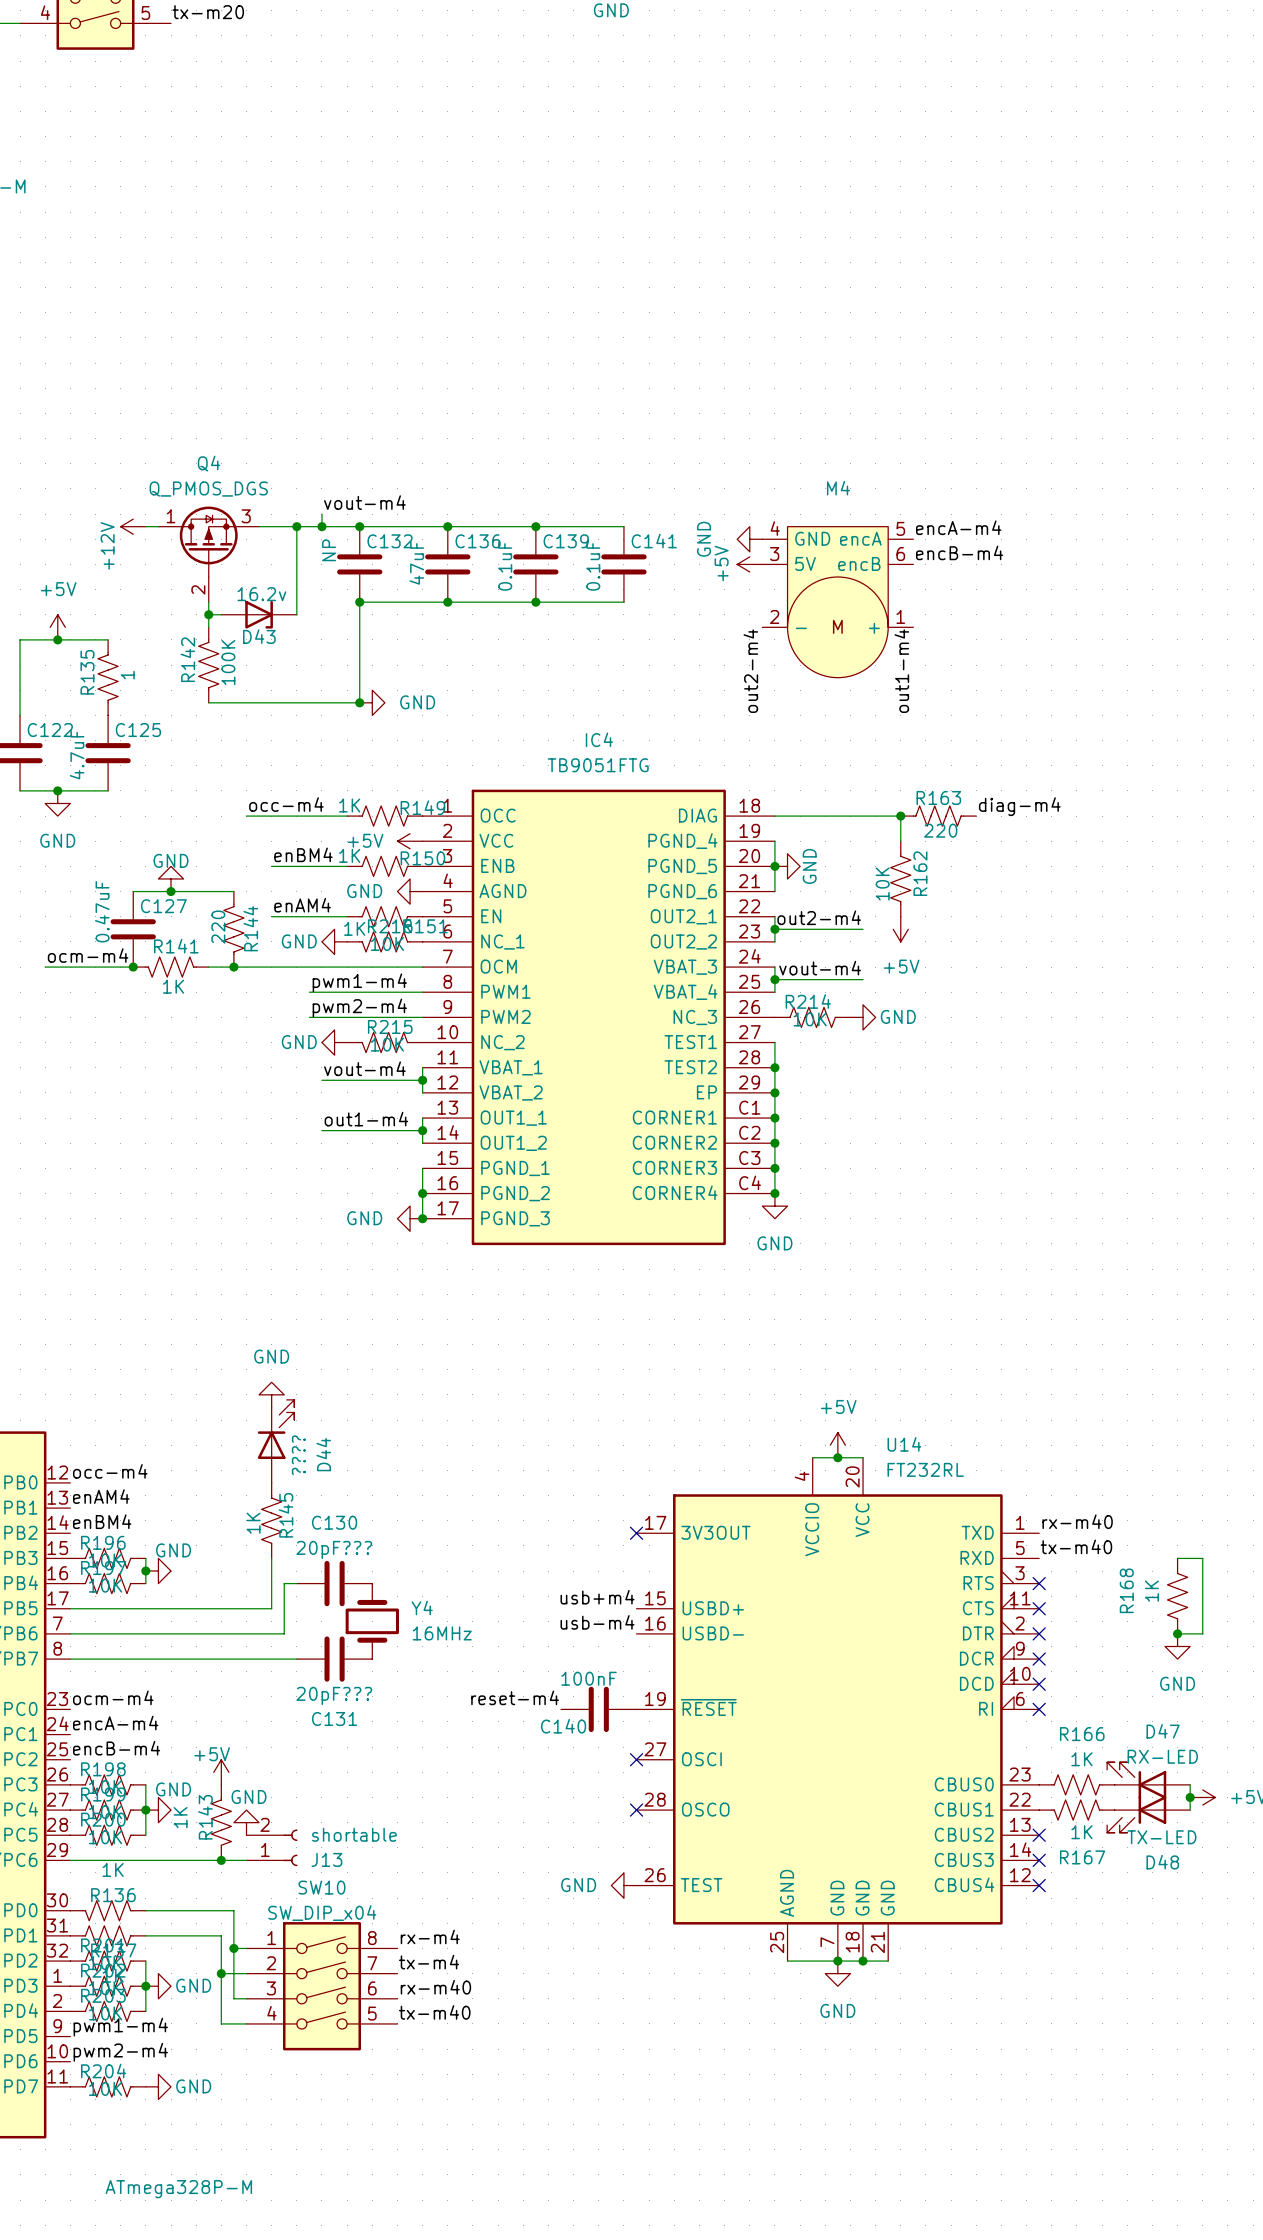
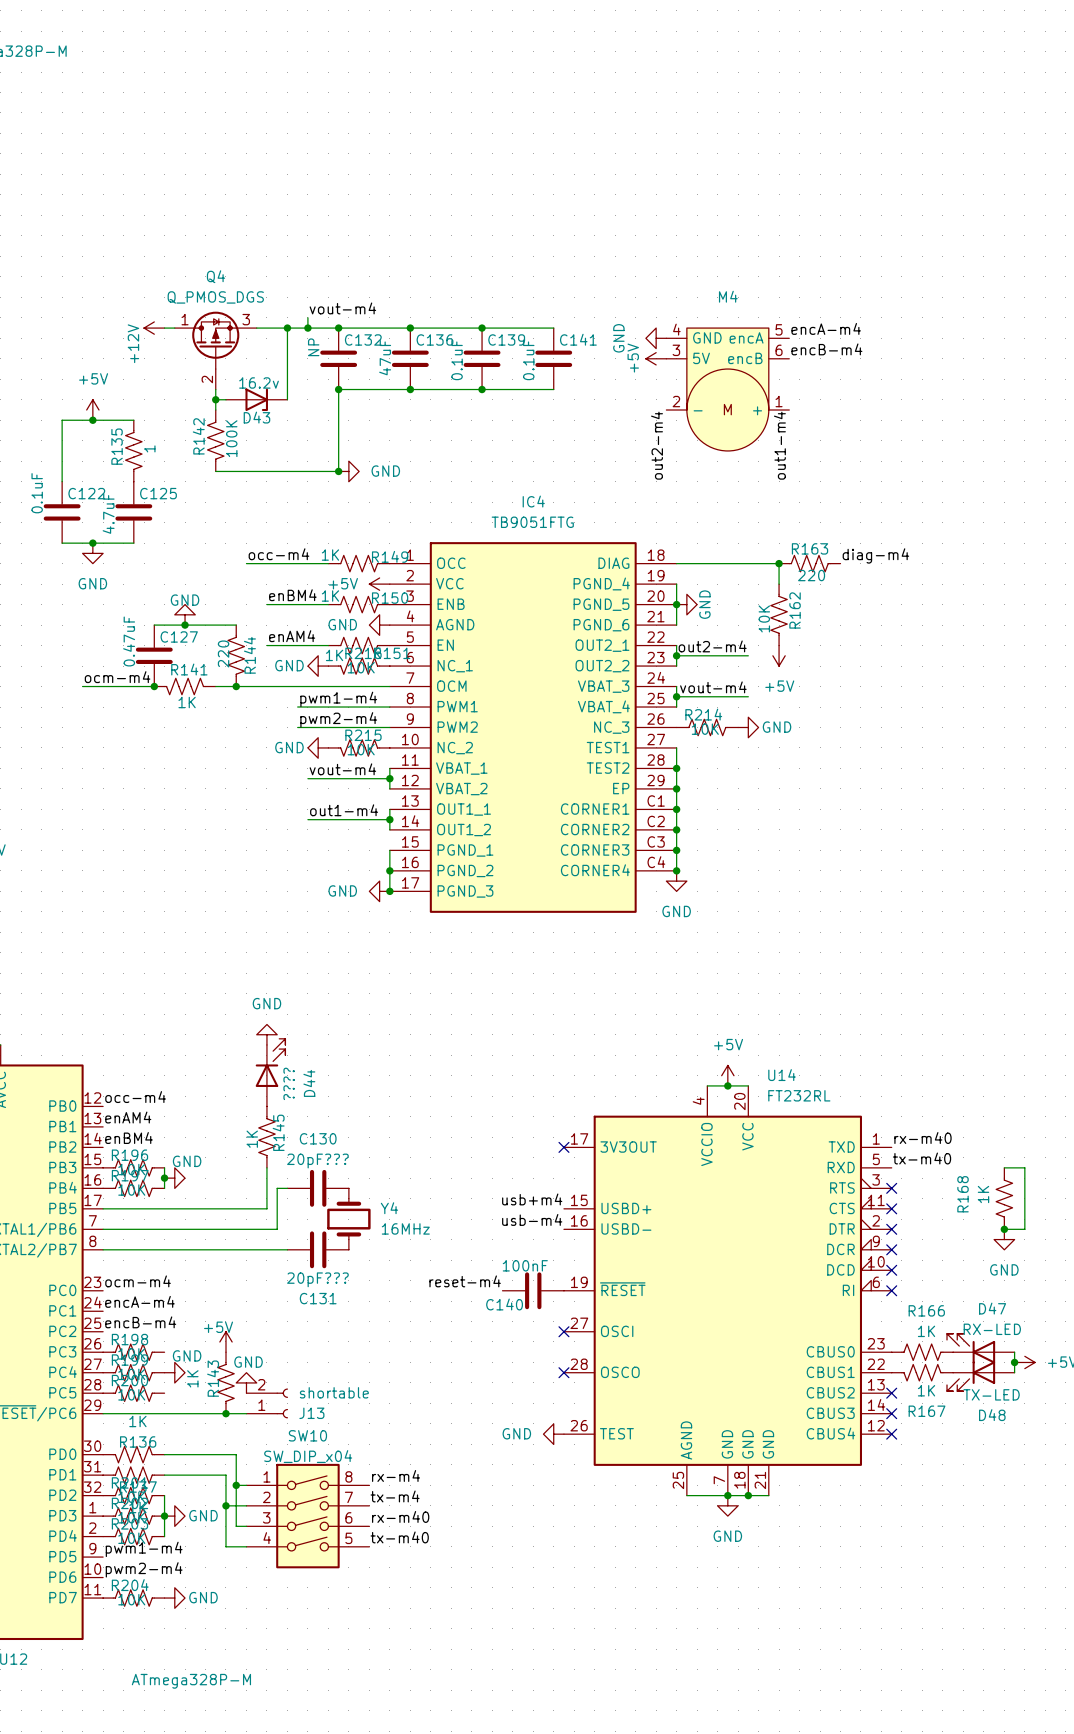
wire: (145, 1784) (145, 1835) -> none
junction: (145, 1810) -> none

